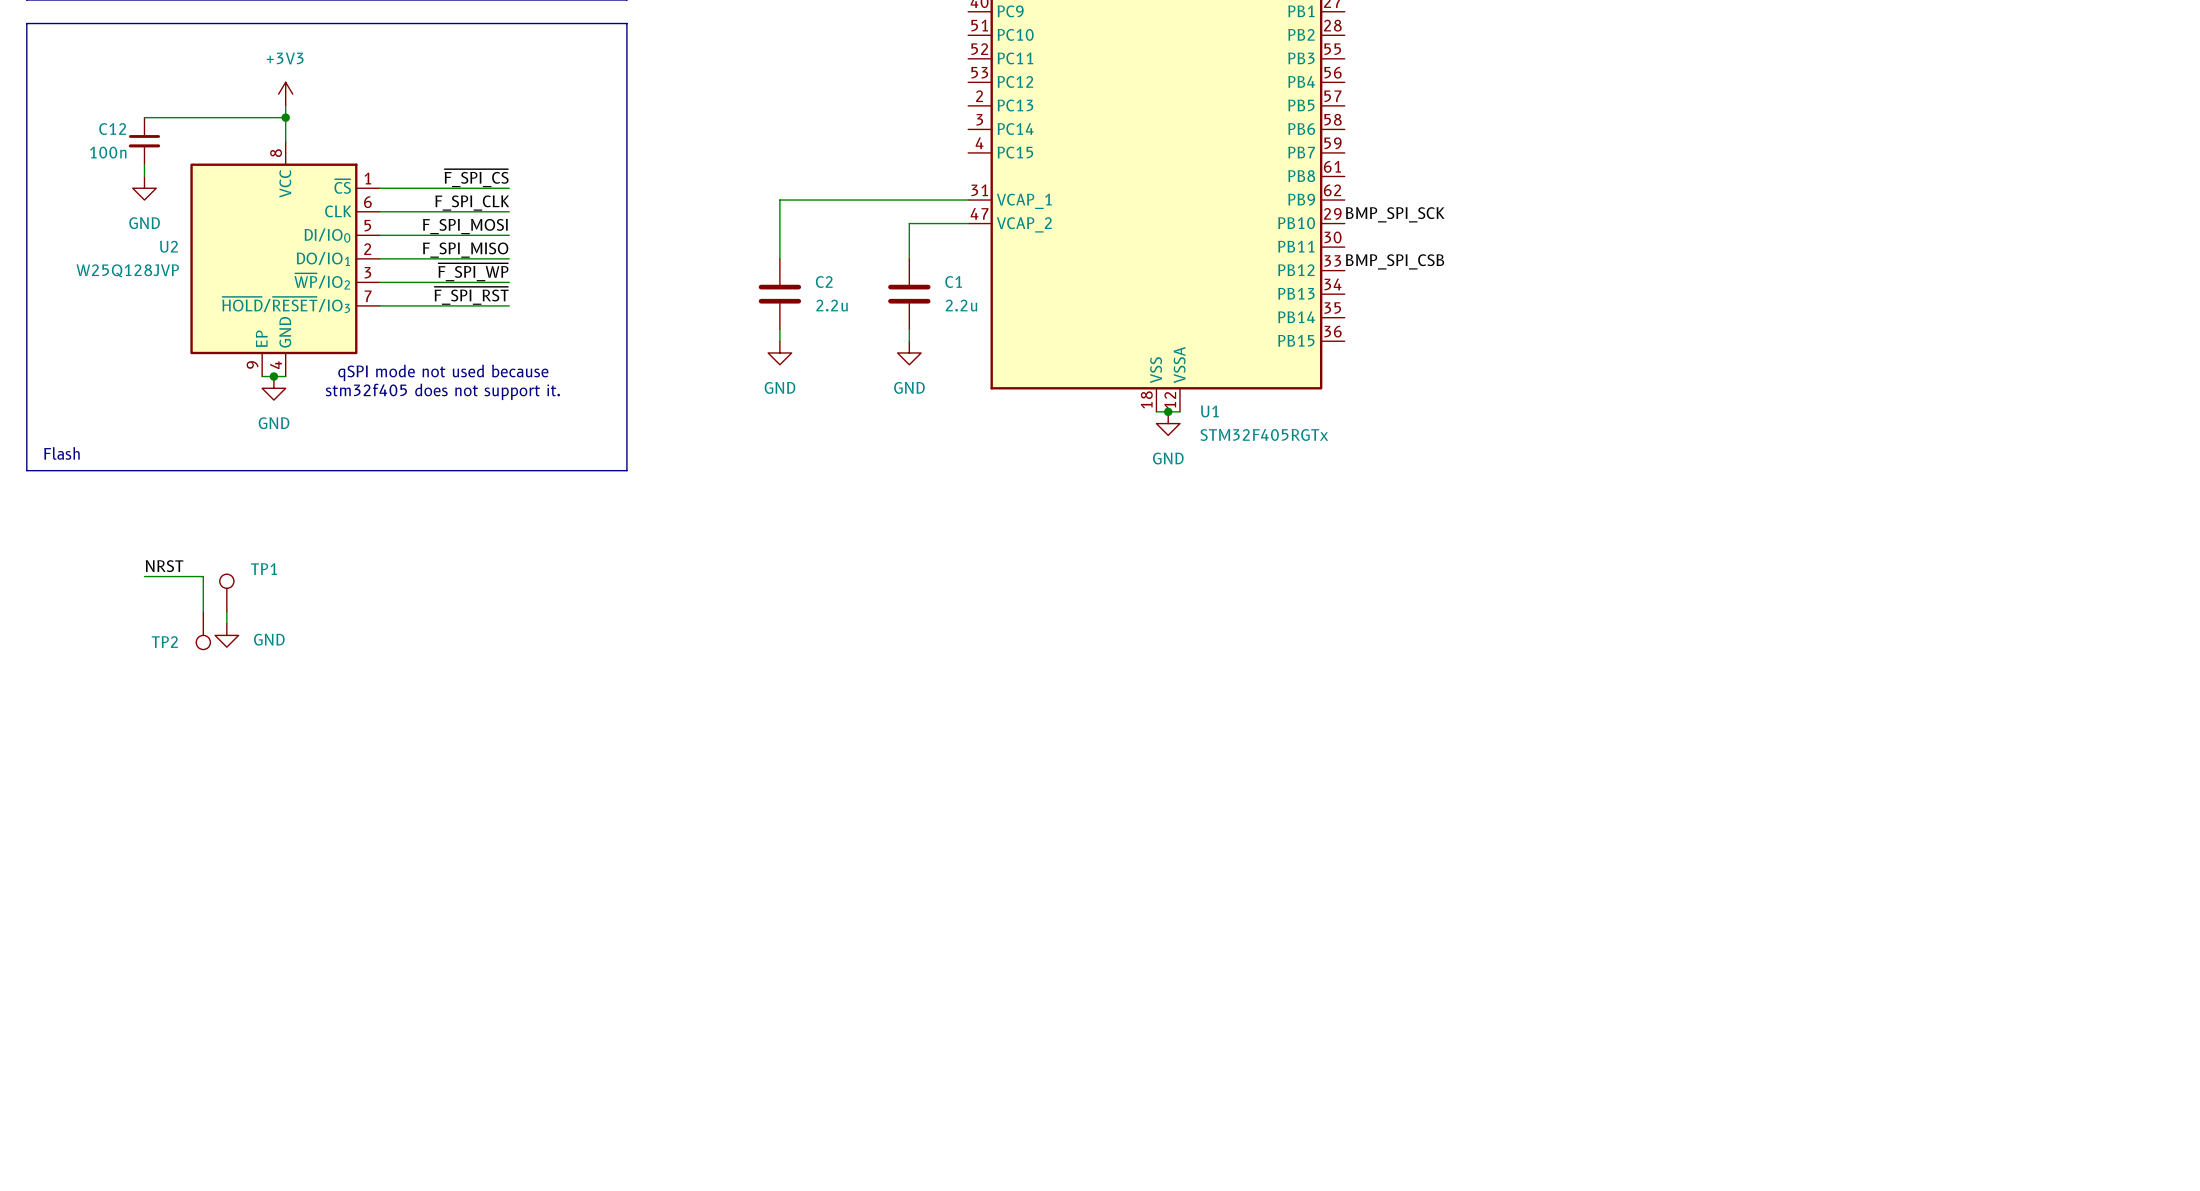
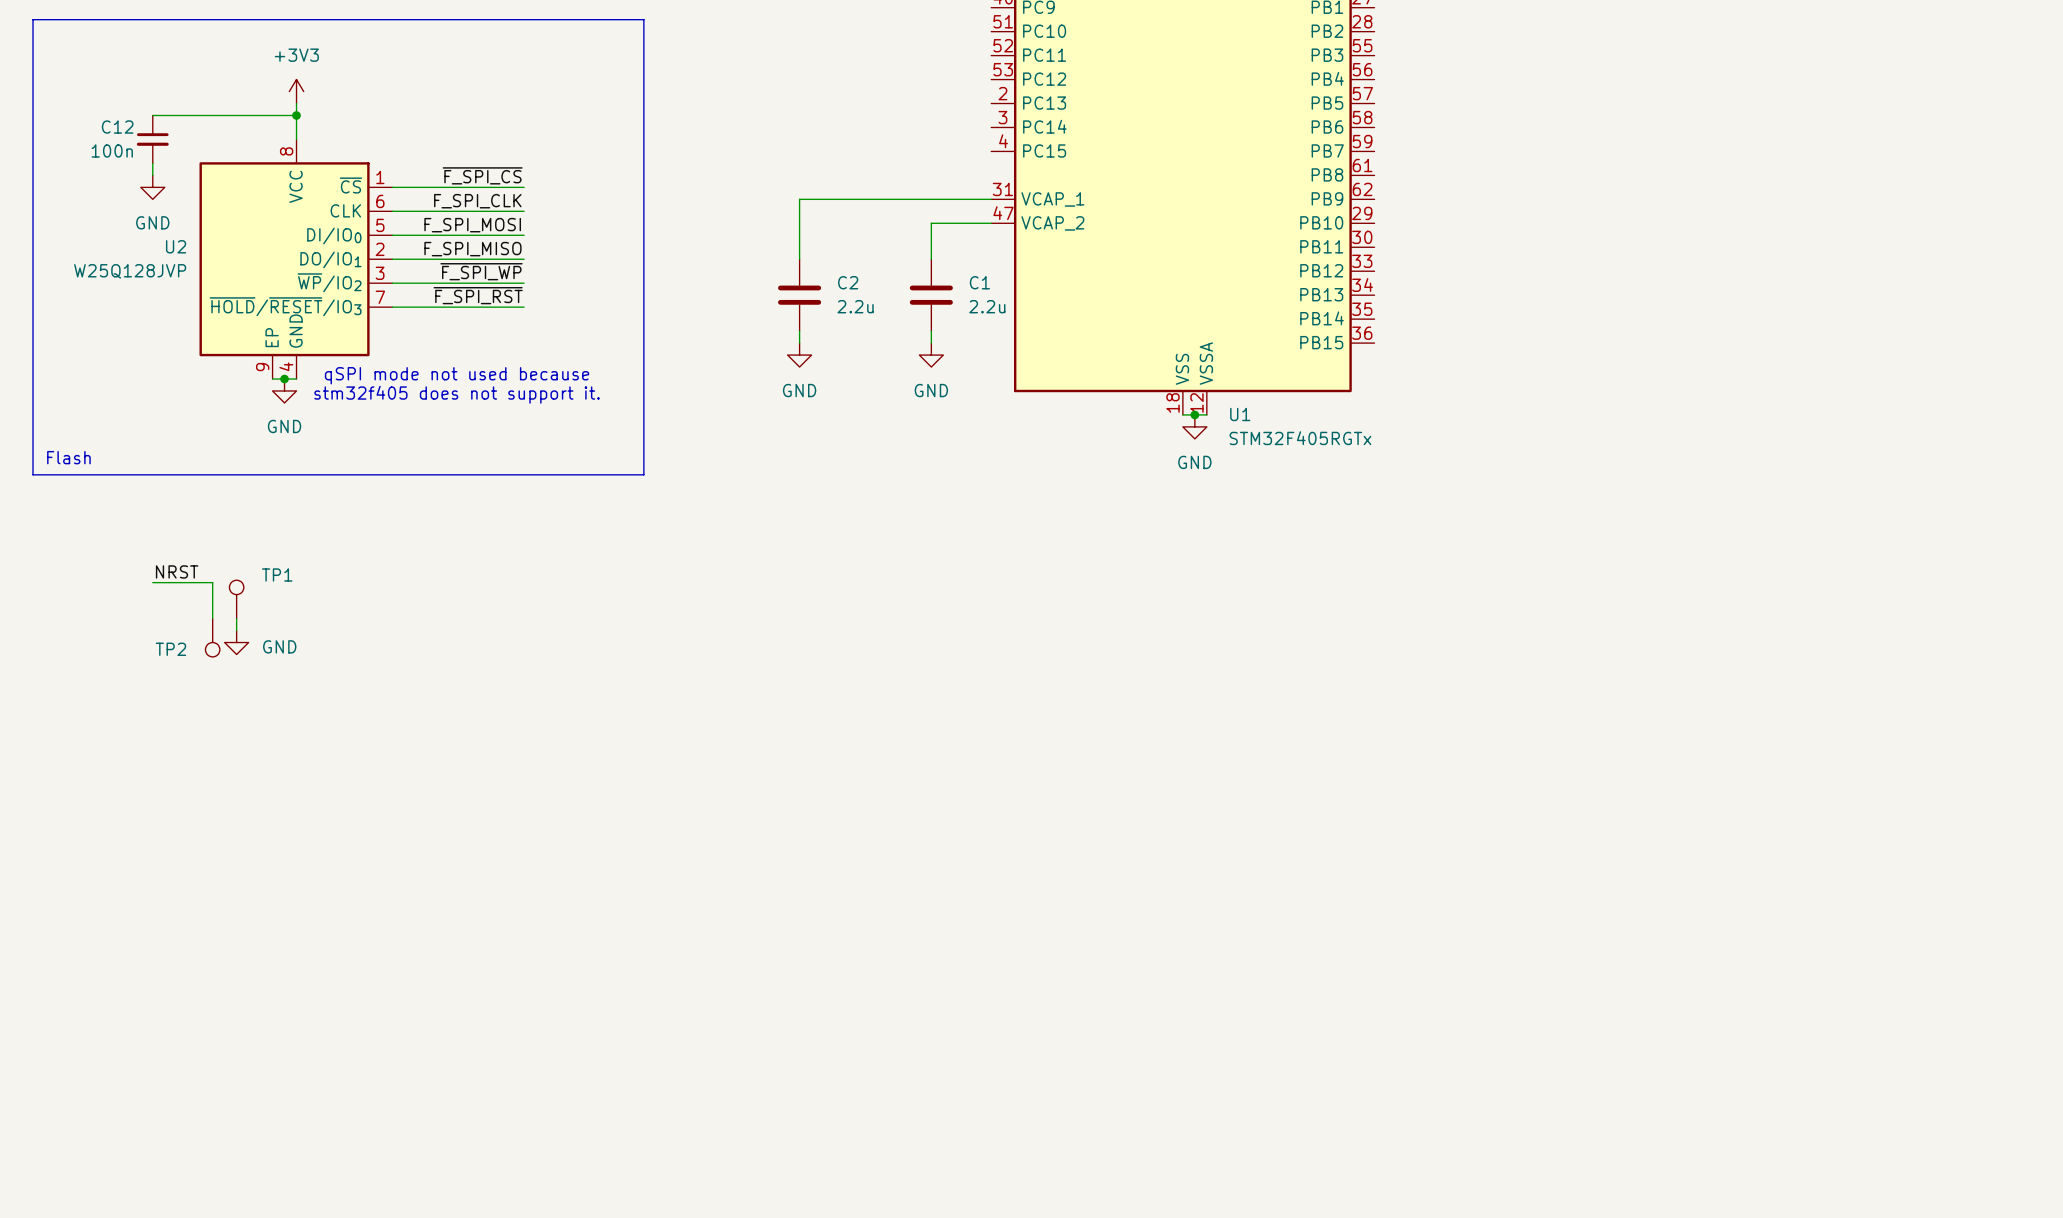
label: BMP_SPI_SCK (1395, 214) -> none
label: BMP_SPI_CSB (1395, 261) -> none

